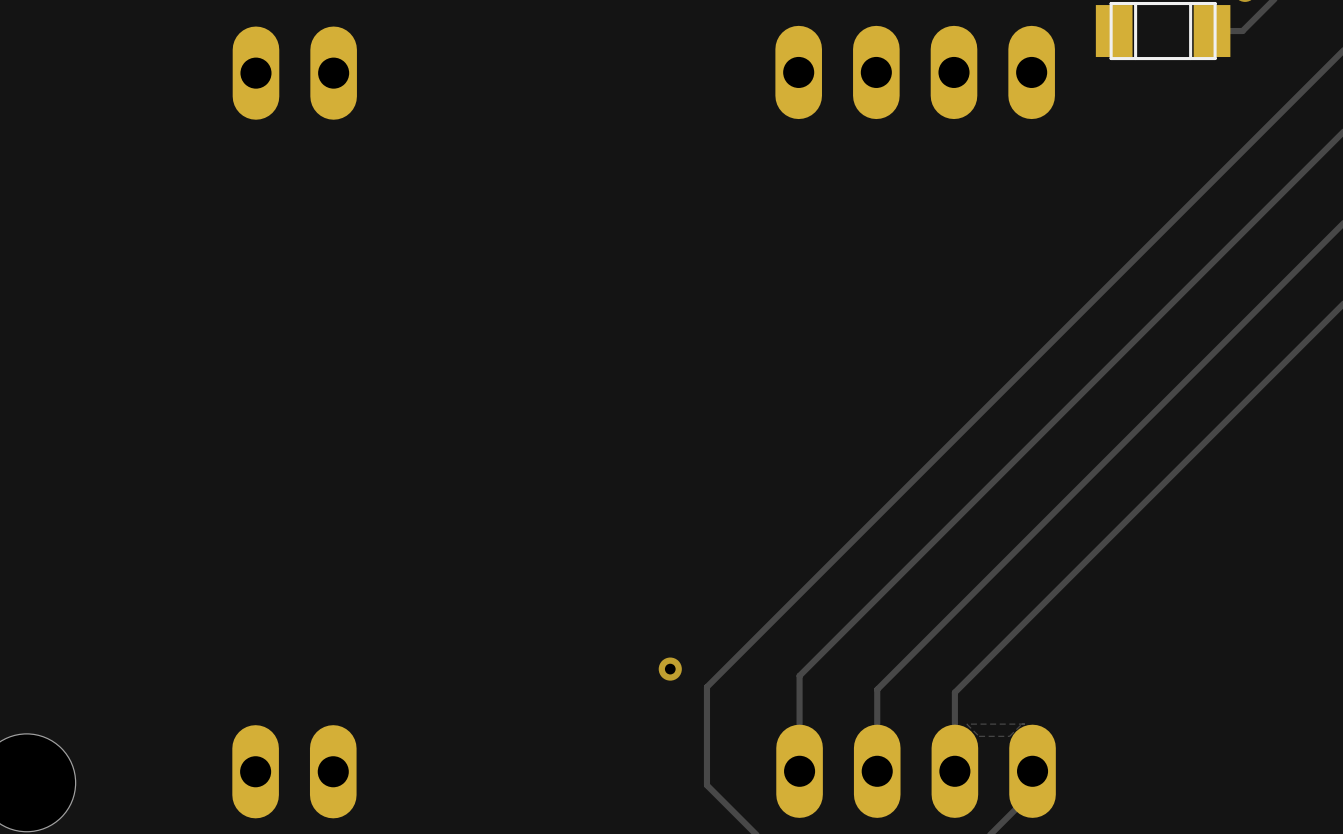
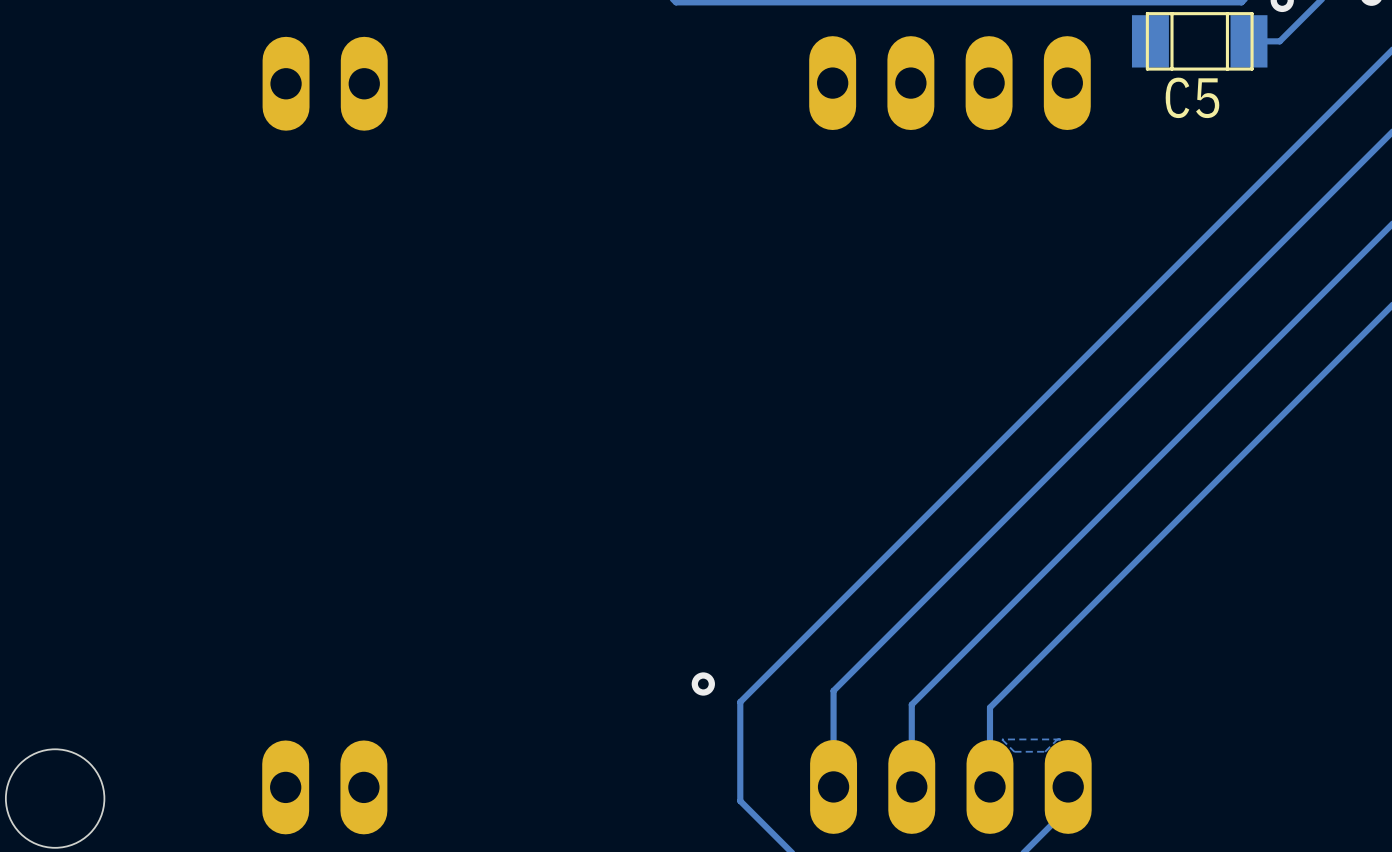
text: none -> C5 (1192, 97)

